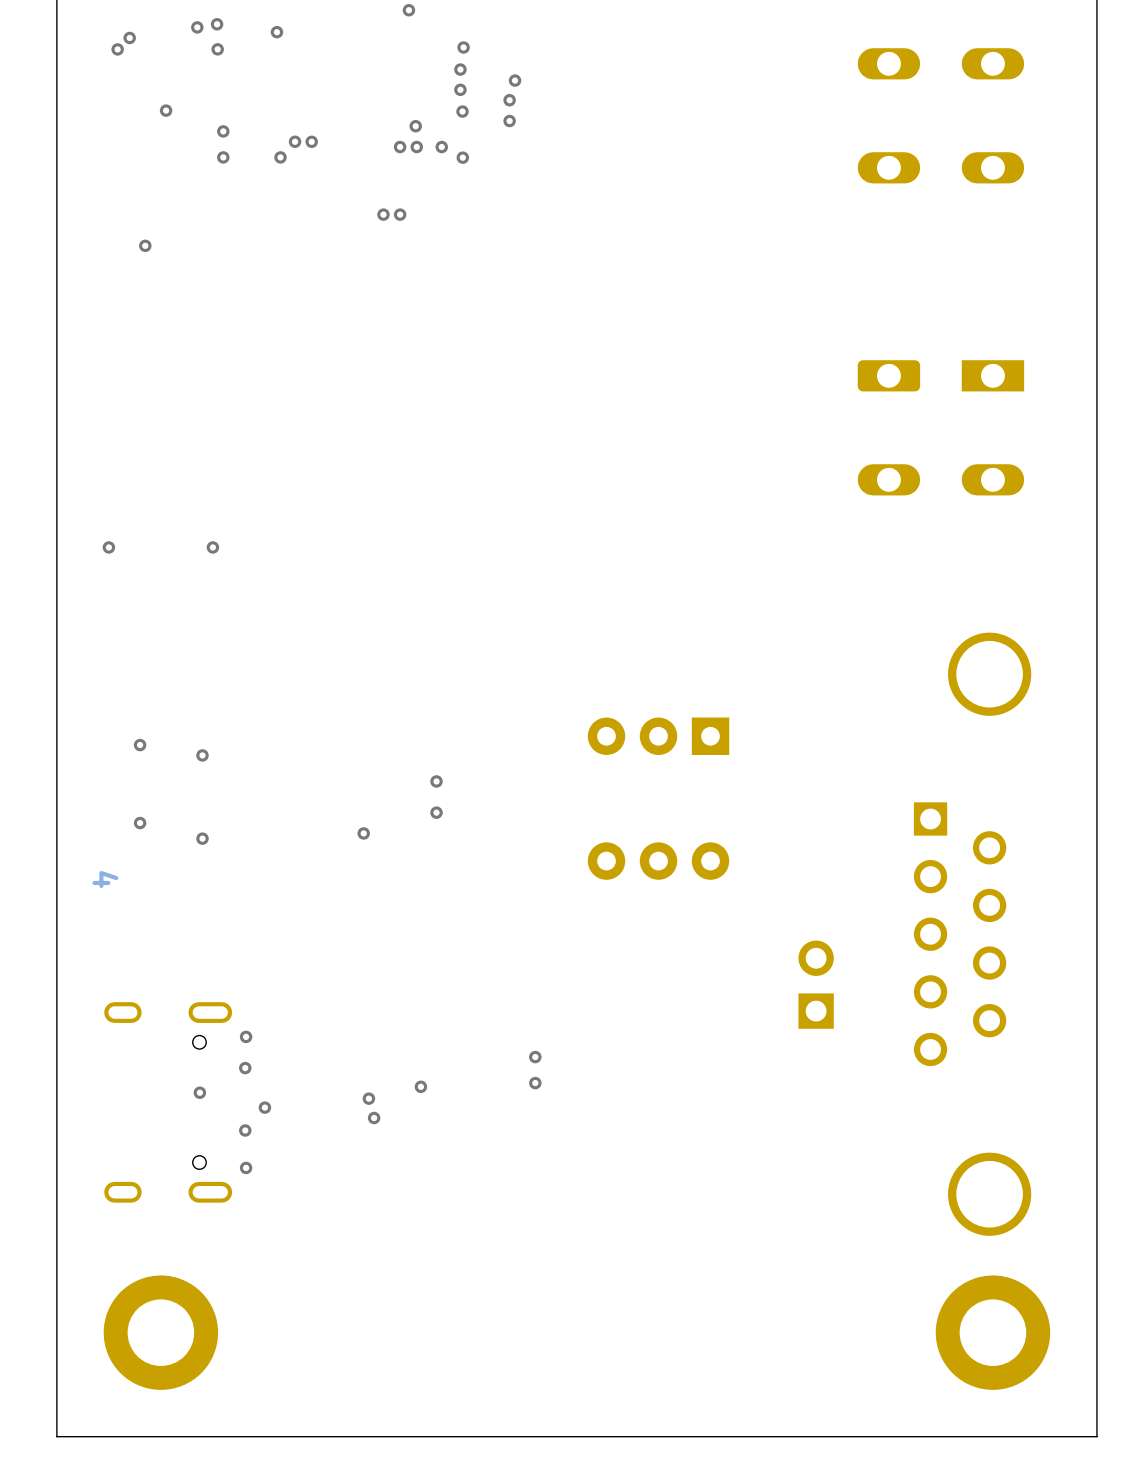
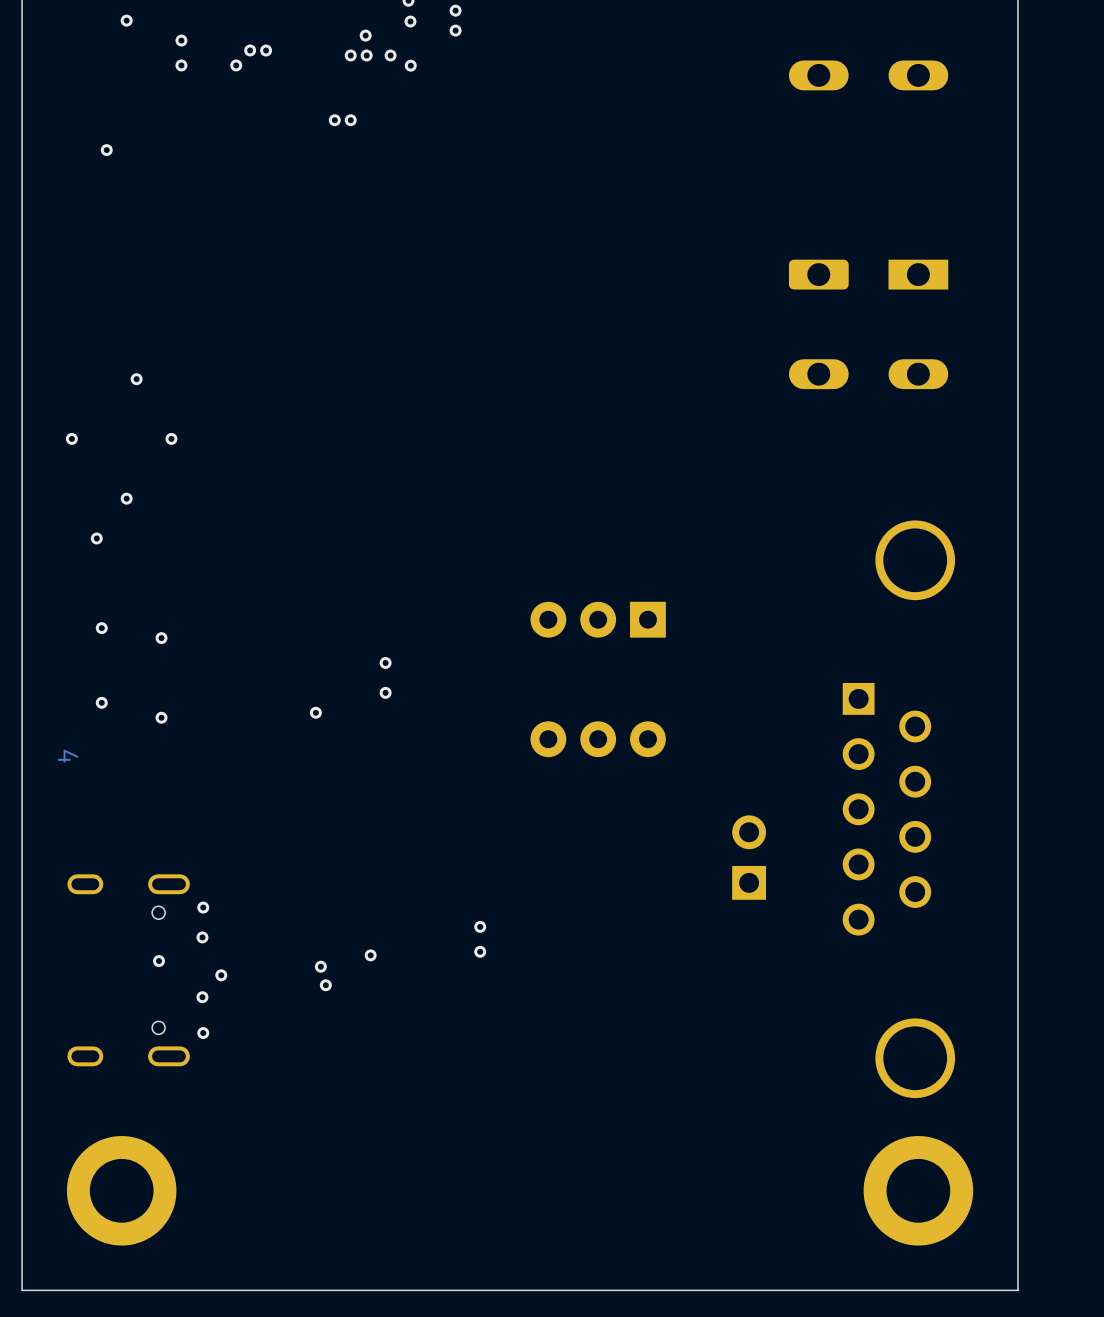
via: none -> (136, 379)
via: none -> (126, 498)
via: none -> (96, 538)

